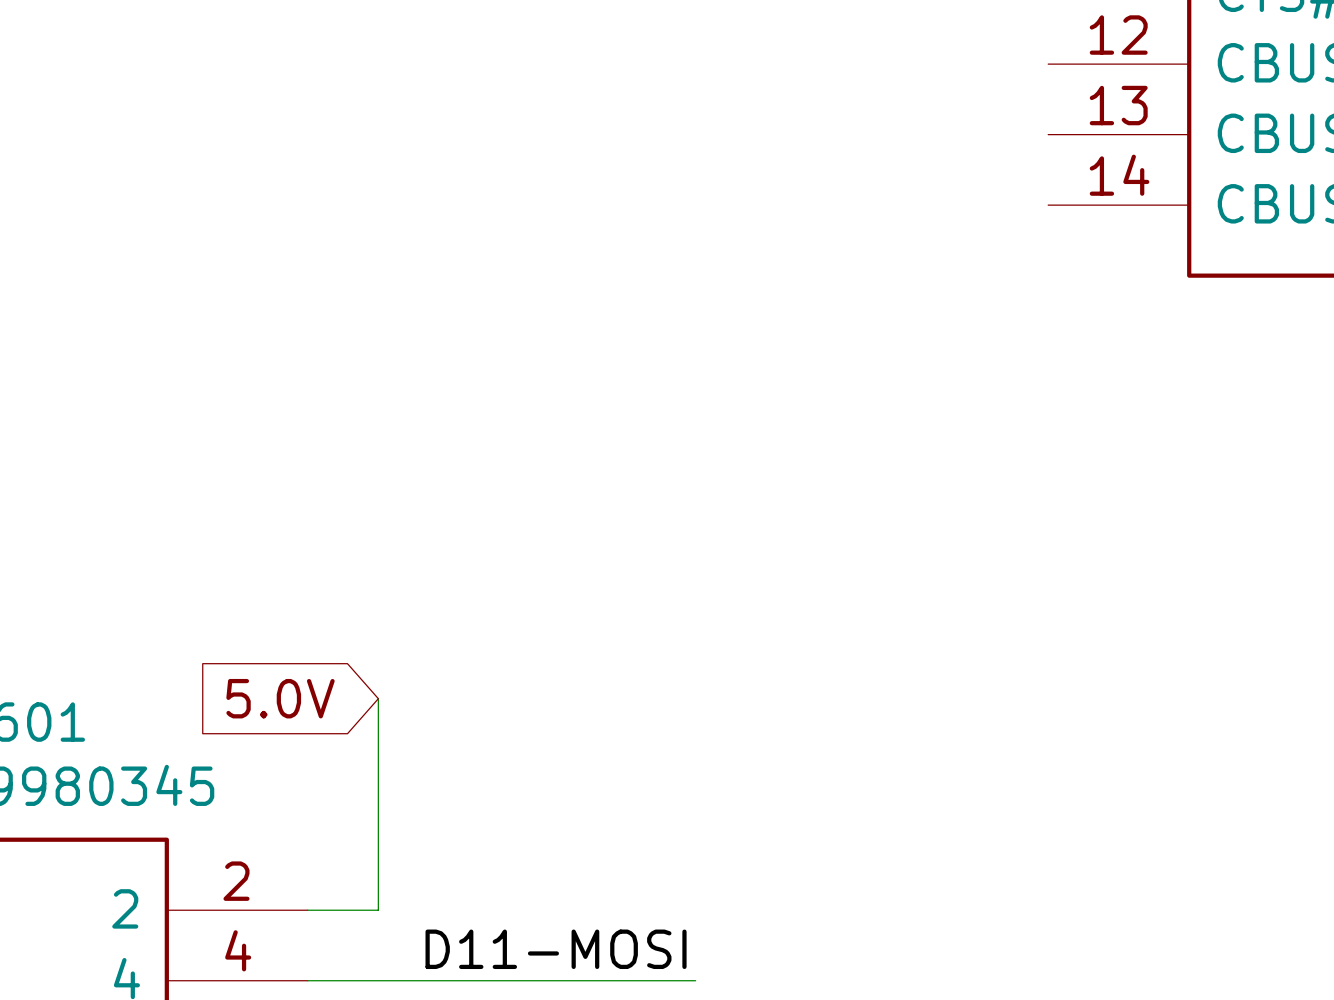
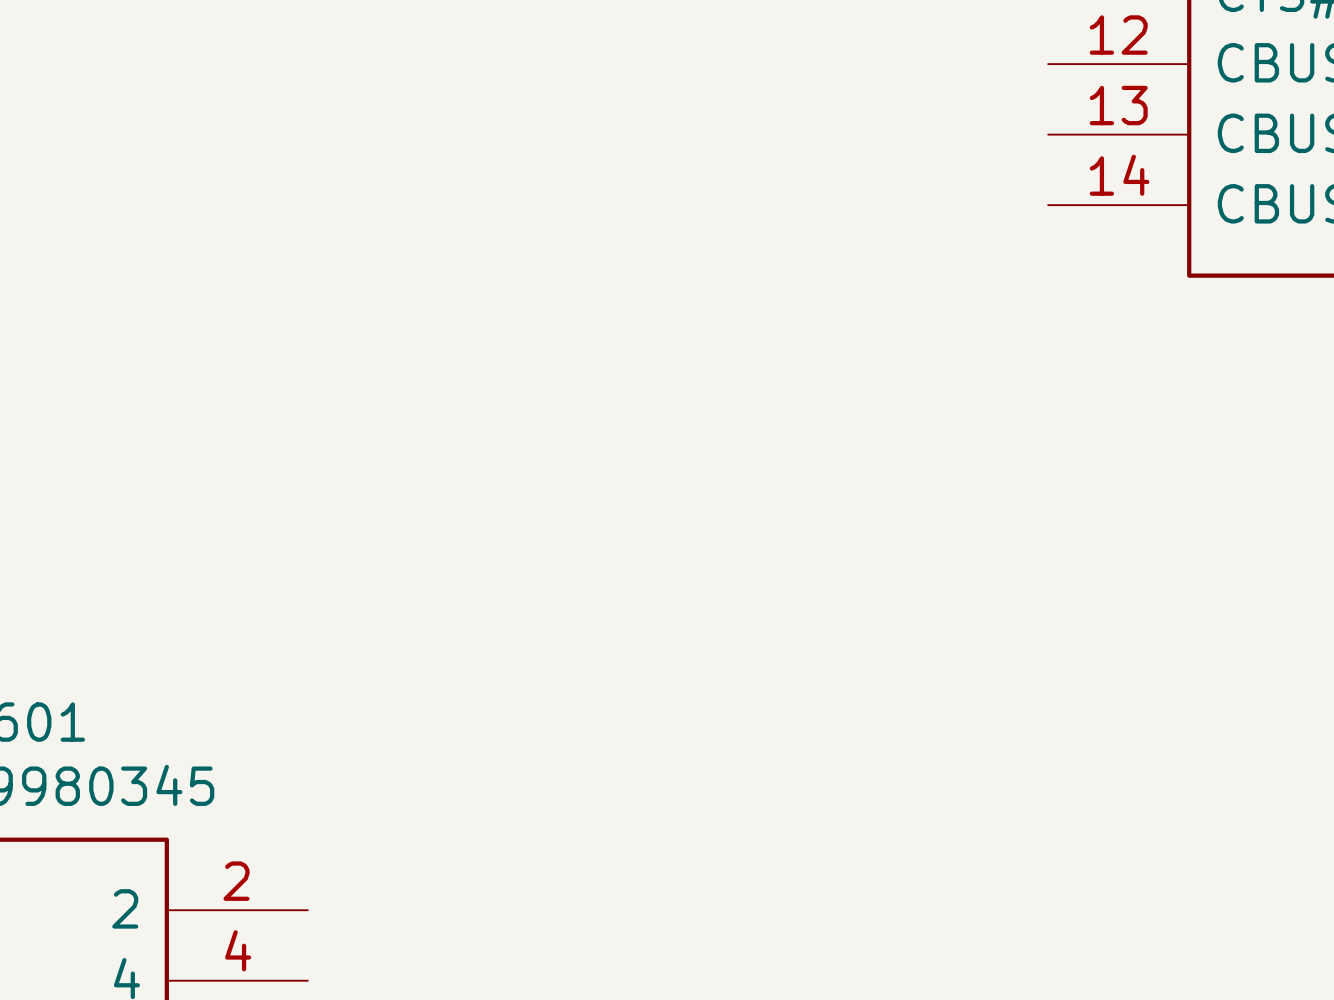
global label: 5.0V (280, 698) -> none
wire: (378, 698) (378, 910) (307, 910) -> none
label: D11-MOSI (556, 949) -> none
wire: (307, 980) (695, 980) -> none

